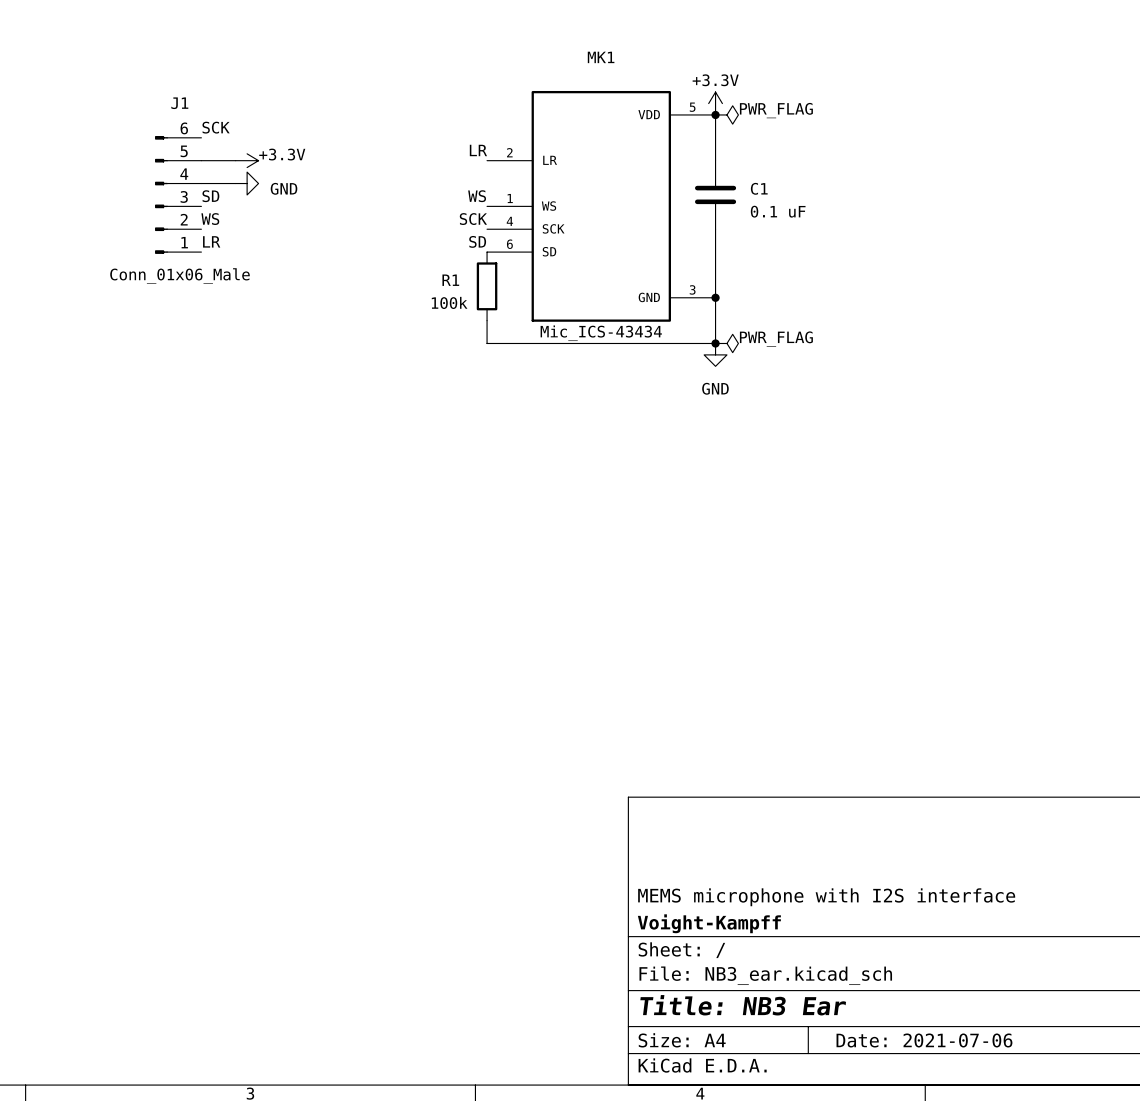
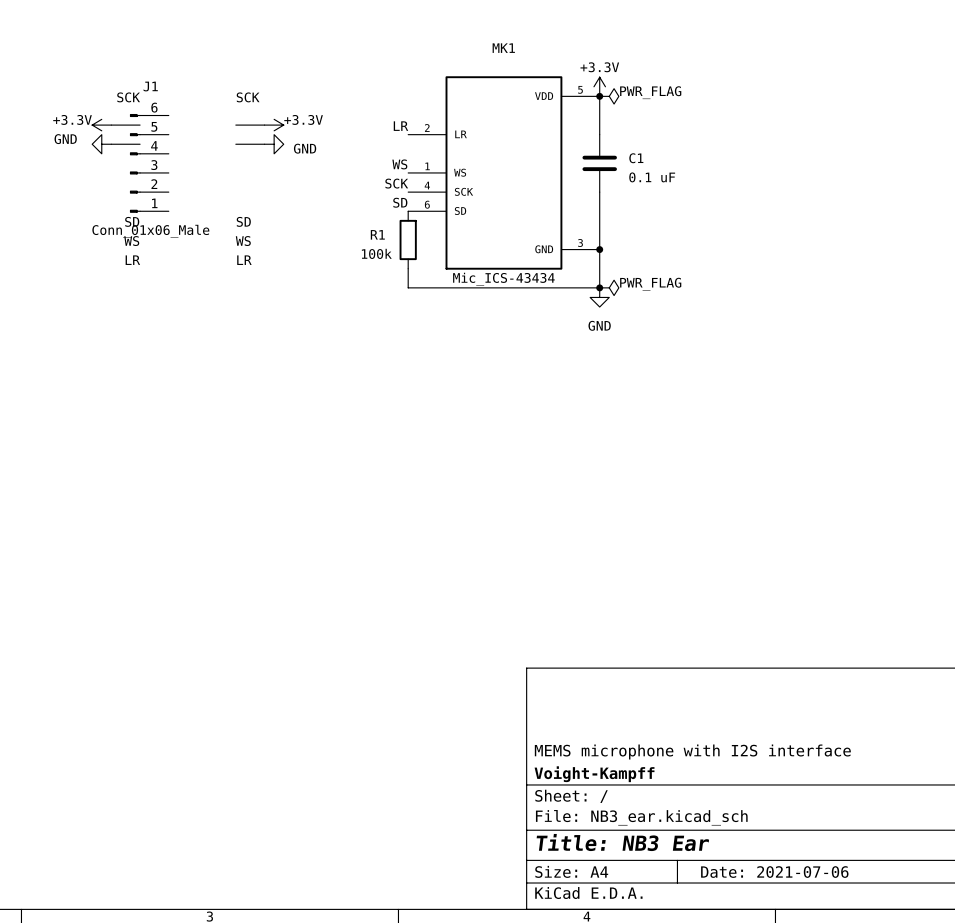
label: none -> SCK (248, 97)
label position: SCK (216, 127) -> SCK (128, 97)
power symbol: none -> +3.3V (101, 125)
wire: none -> (235, 125) (264, 125)
power symbol: none -> +3.3V (274, 125)
wire: (201, 160) (235, 160) -> (111, 125) (140, 125)
power symbol: +3.3V (247, 160) -> none
power symbol: none -> GND (101, 144)
wire: none -> (235, 144) (264, 144)
power symbol: none -> GND (274, 144)
wire: (201, 183) (235, 183) -> (111, 144) (140, 144)
power symbol: GND (247, 183) -> none
label: SD (210, 196) -> none
label: WS (210, 219) -> none
label: LR (211, 241) -> none
label: none -> SD (132, 221)
label: none -> SD (243, 221)
label: none -> WS (131, 241)
label: none -> WS (243, 241)
label: none -> LR (132, 260)
label: none -> LR (244, 260)

